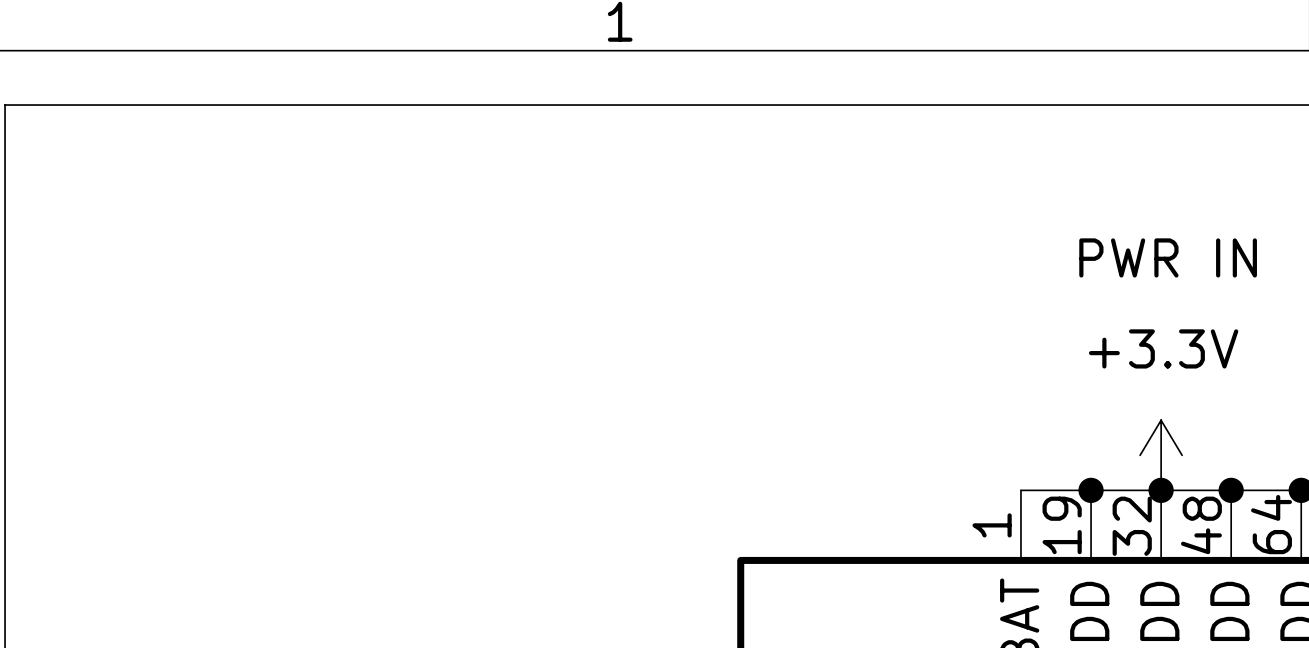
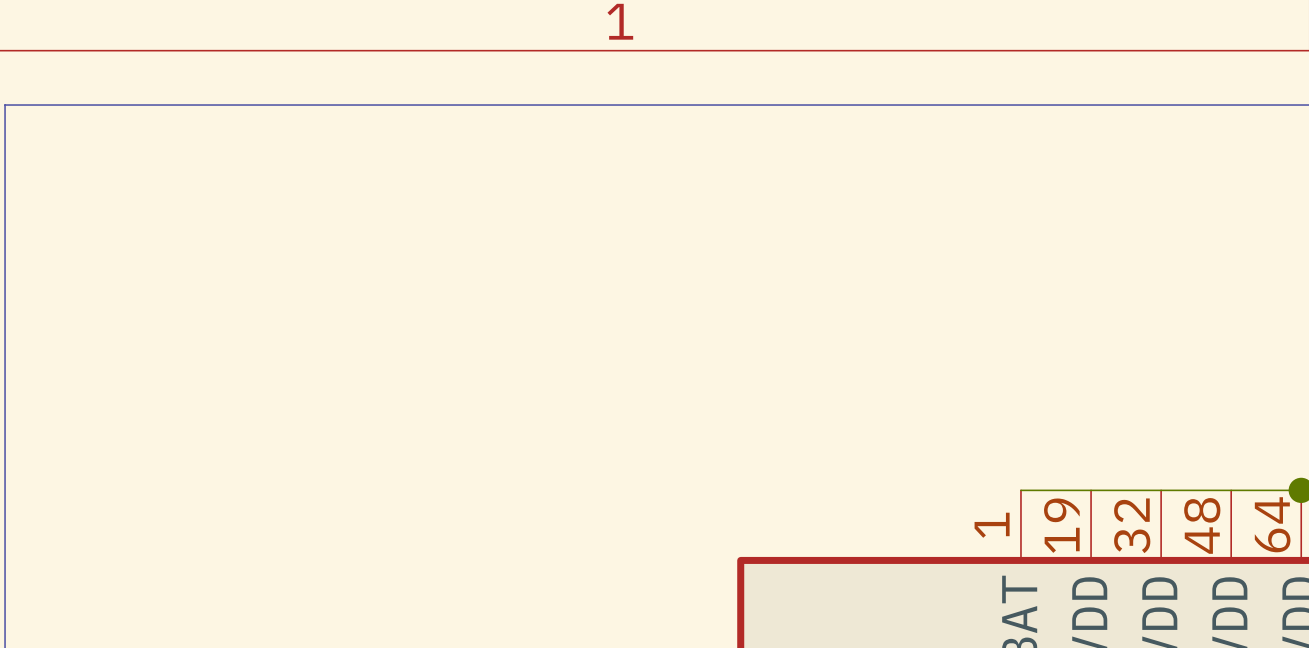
text: PWR IN (1168, 257) -> none
power symbol: +3.3V (1161, 455) -> none
junction: (1091, 490) -> none
junction: (1161, 490) -> none
junction: (1231, 490) -> none

